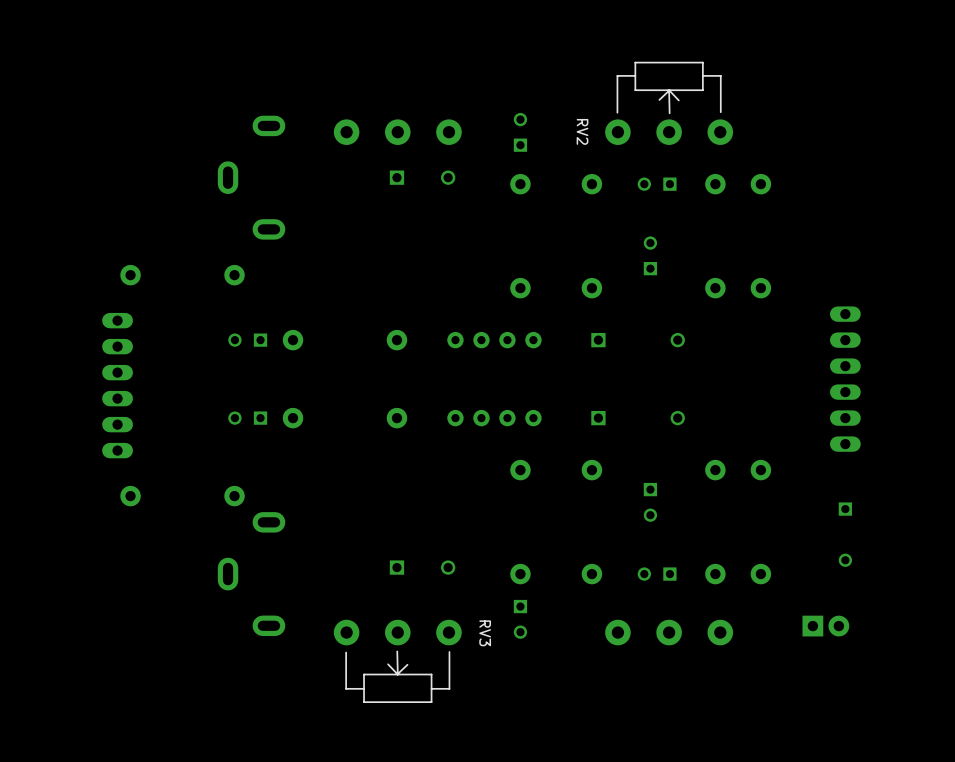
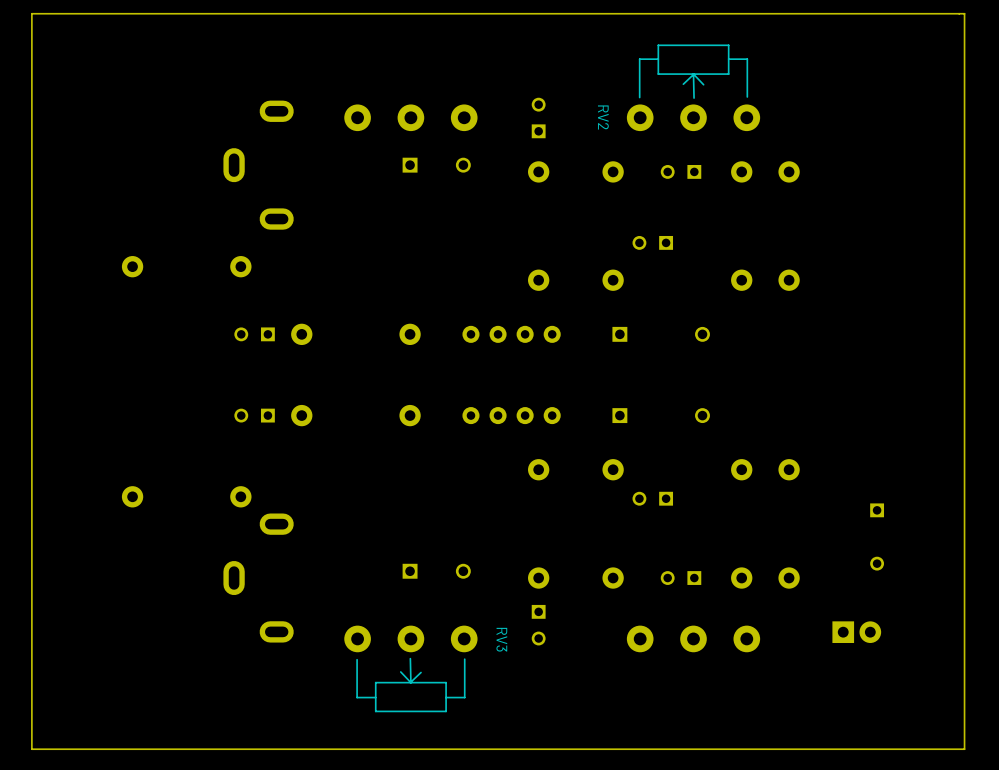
board edge: none -> (964, 13) (31, 13) (31, 749) (964, 749) (964, 13)
part rotation: 0° (650, 255) -> 90° counterclockwise (652, 242)
part: (845, 379) -> none
part: (117, 385) -> none
part rotation: 0° (650, 502) -> 90° clockwise (652, 498)

